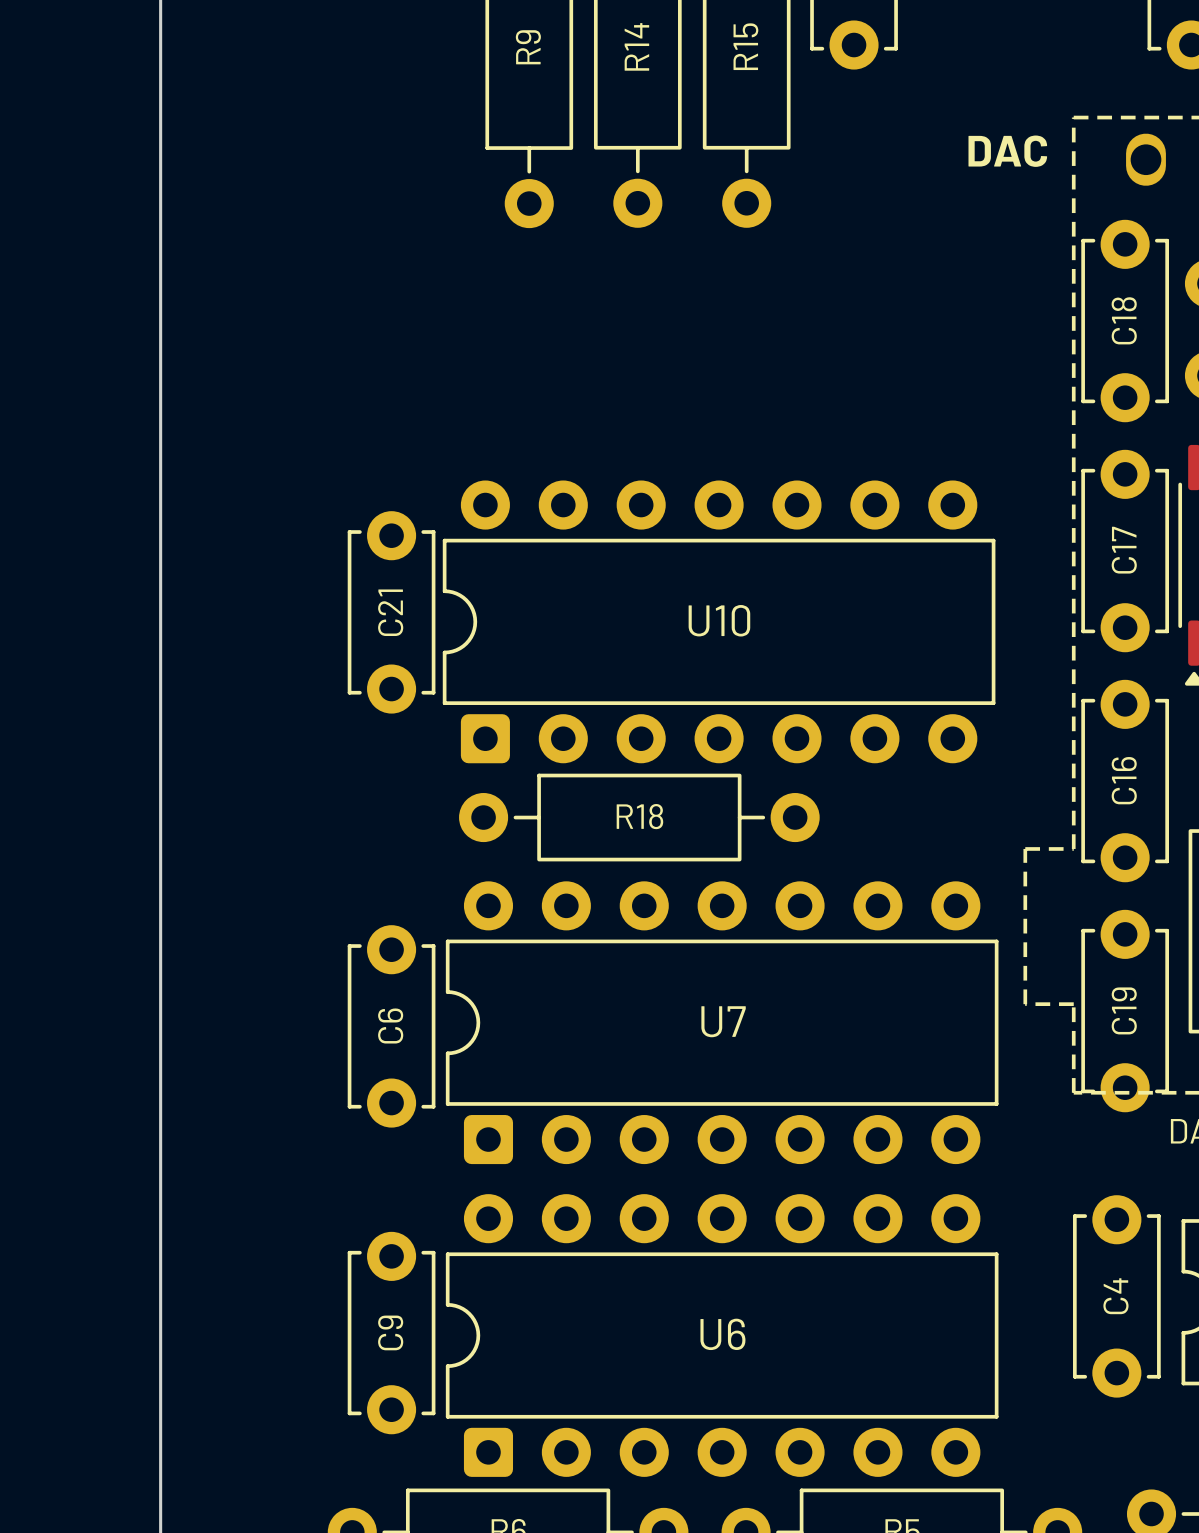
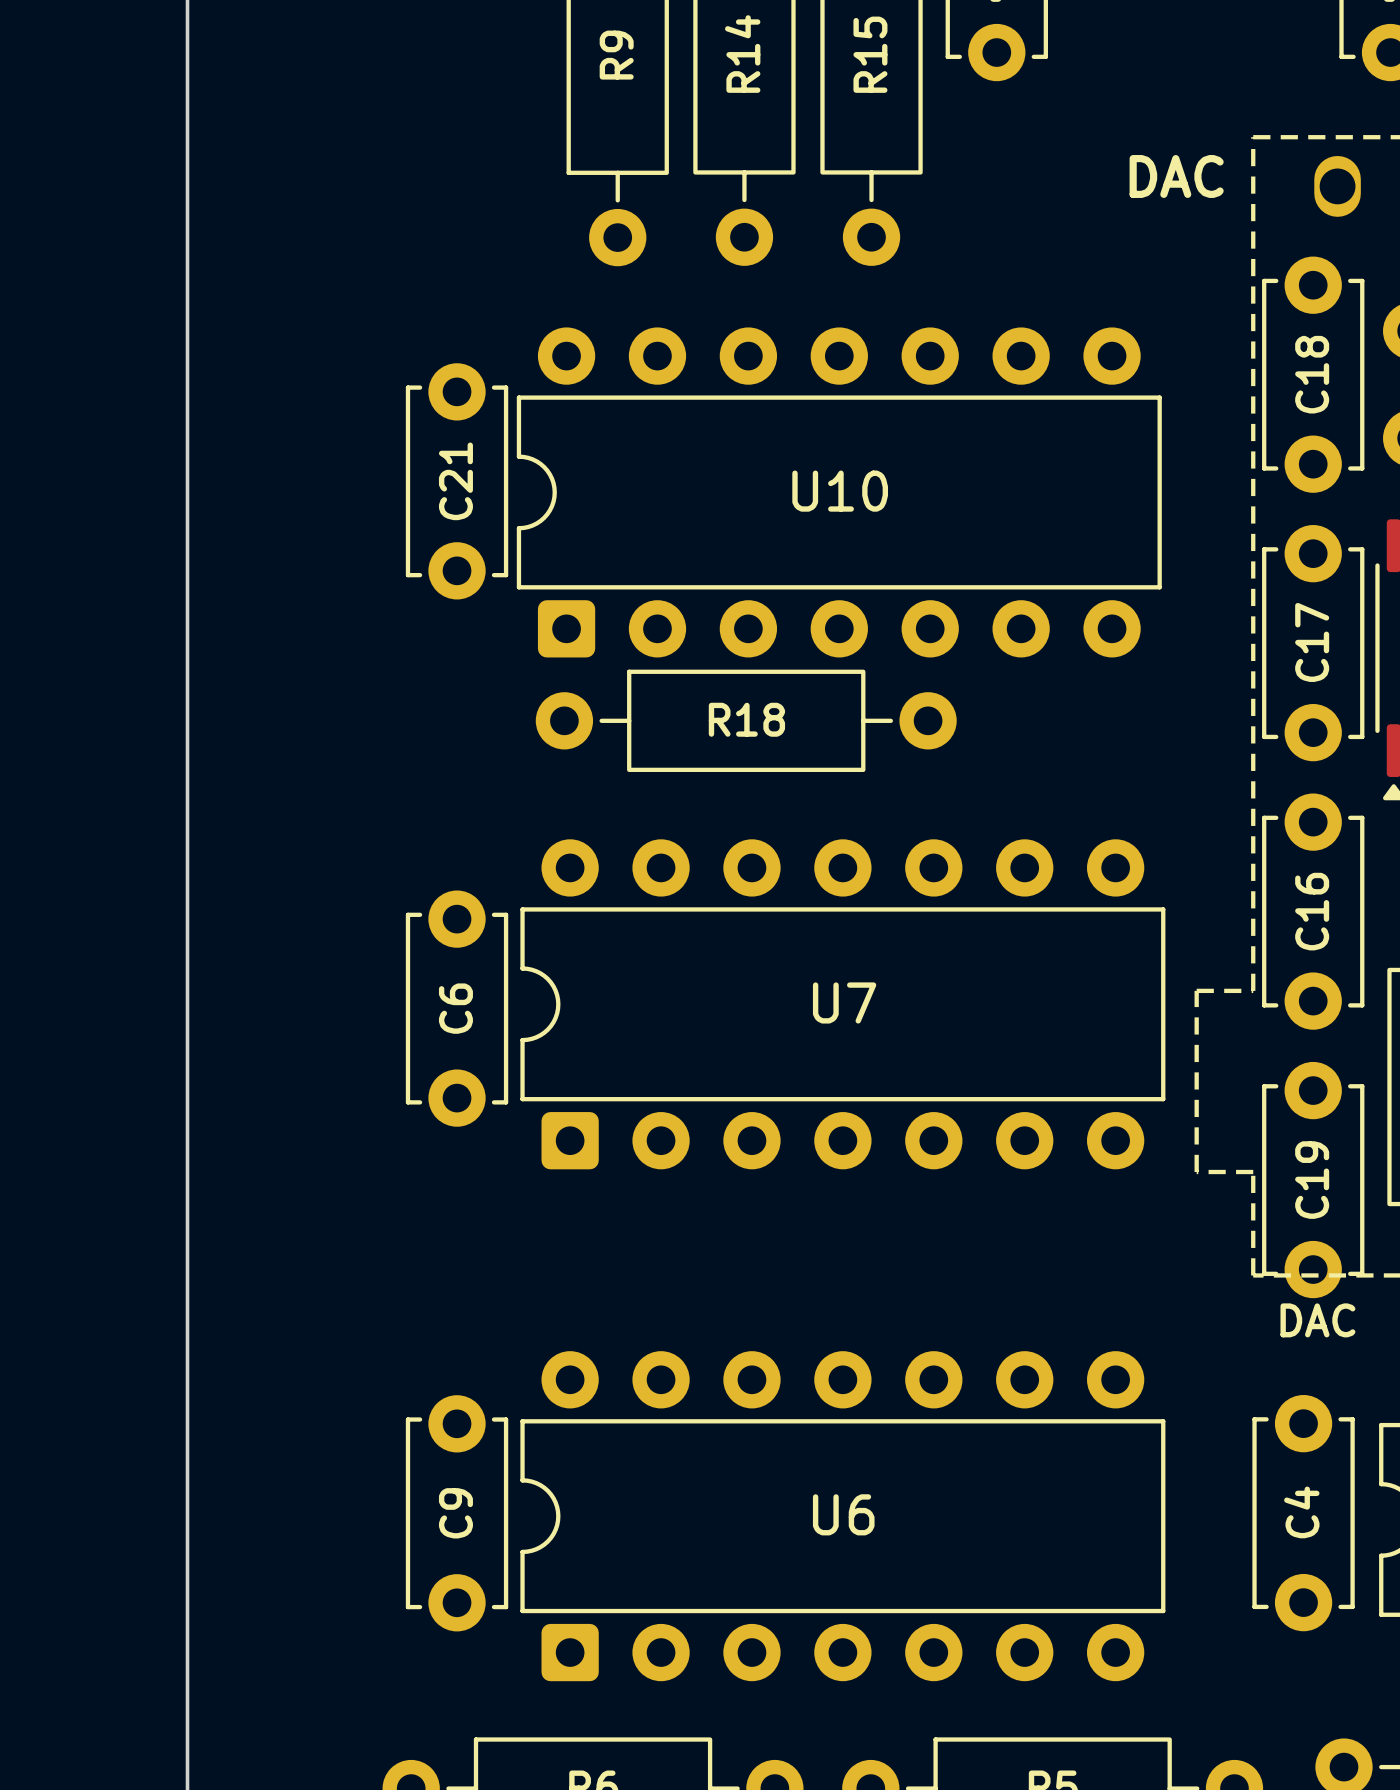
C21 position: (391, 612) -> (457, 481)
U10 position: (719, 621) -> (839, 492)
R18 position: (639, 817) -> (746, 720)
U7 position: (722, 1022) -> (842, 1004)
C6 position: (391, 1026) -> (457, 1008)
C9 position: (391, 1333) -> (457, 1513)
U6 position: (722, 1335) -> (842, 1516)

